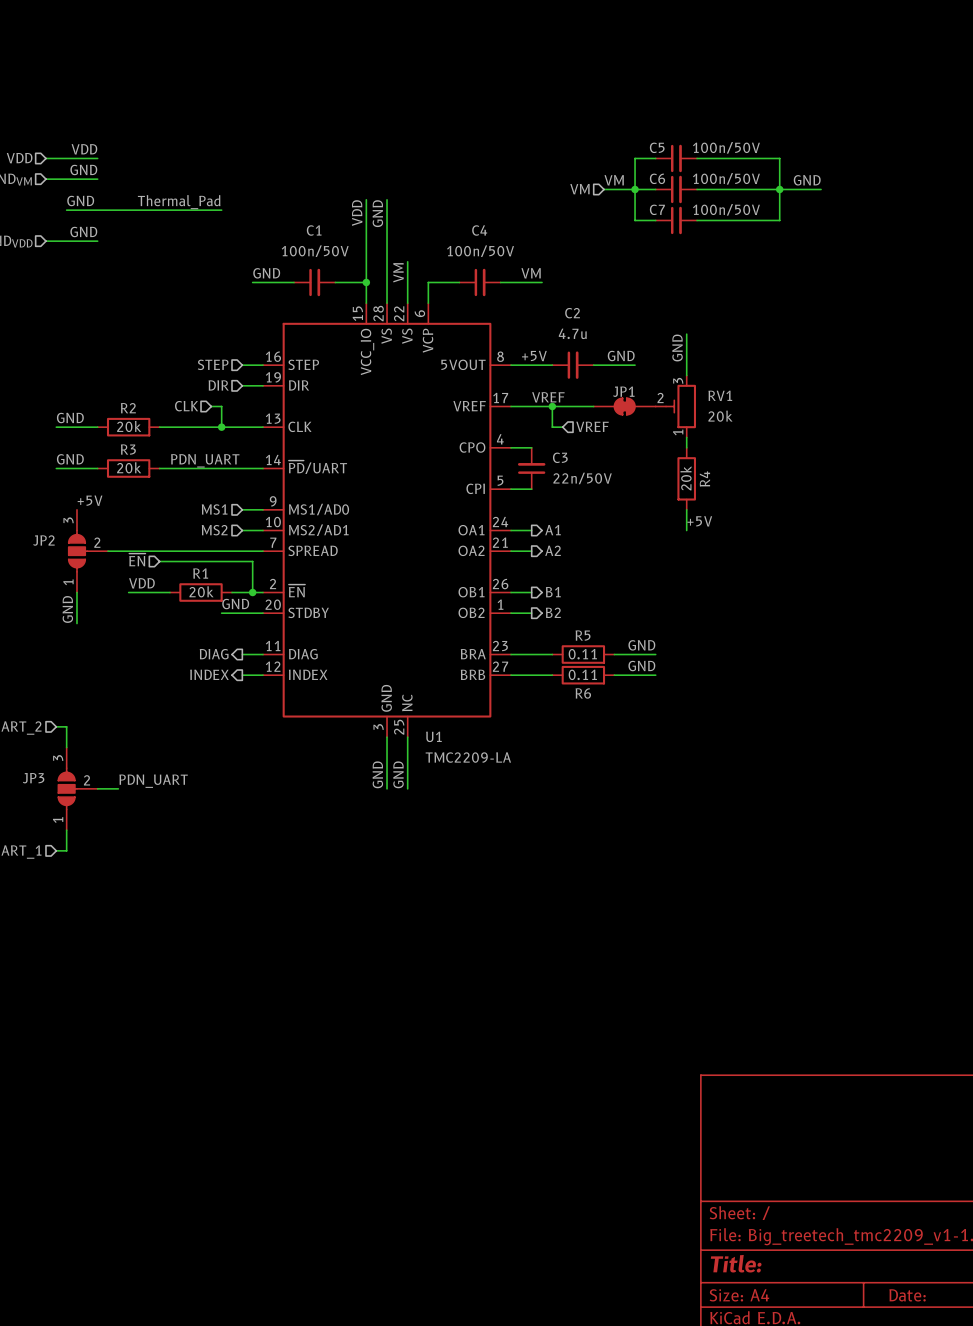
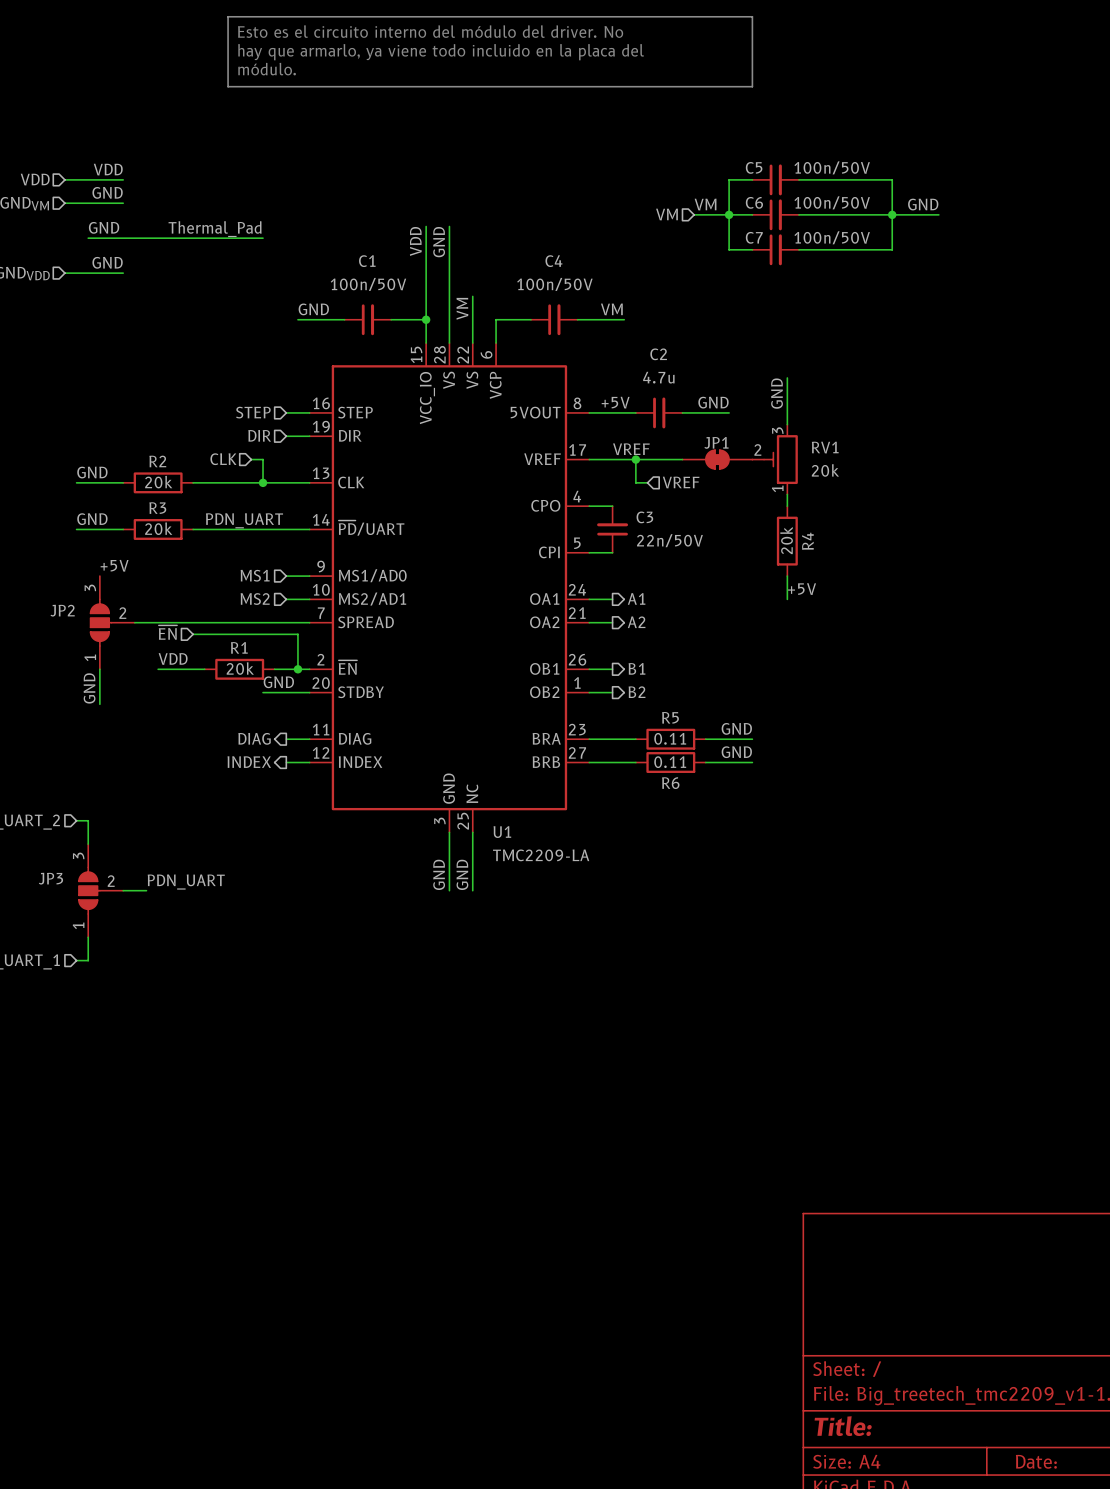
line: none -> (228, 16) (752, 16) (752, 86) (228, 86) (228, 16)
text: none -> Esto es el circuito interno del módulo del driver. No (430, 31)
text: none -> hay que armarlo, ya viene todo incluido en la placa del (441, 52)
text: none -> módulo. (267, 69)

